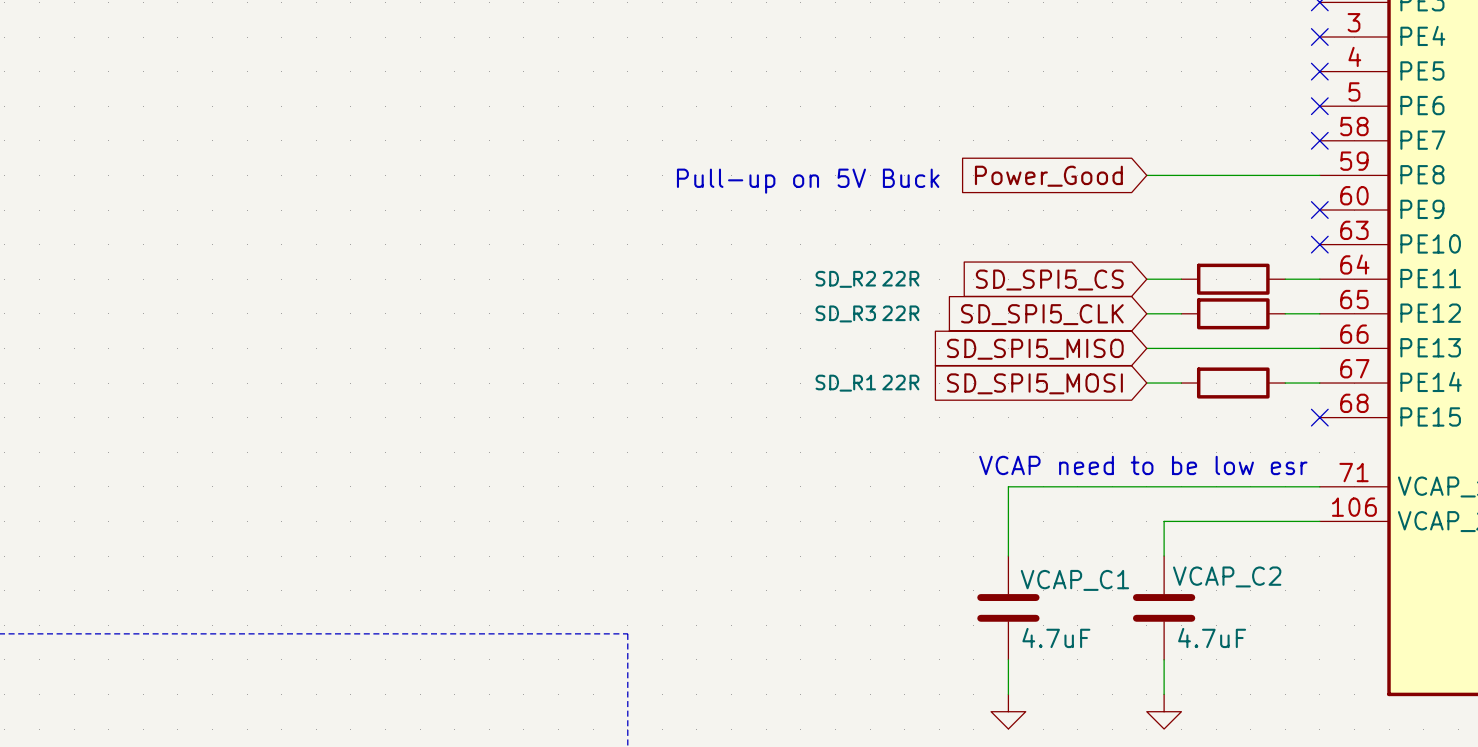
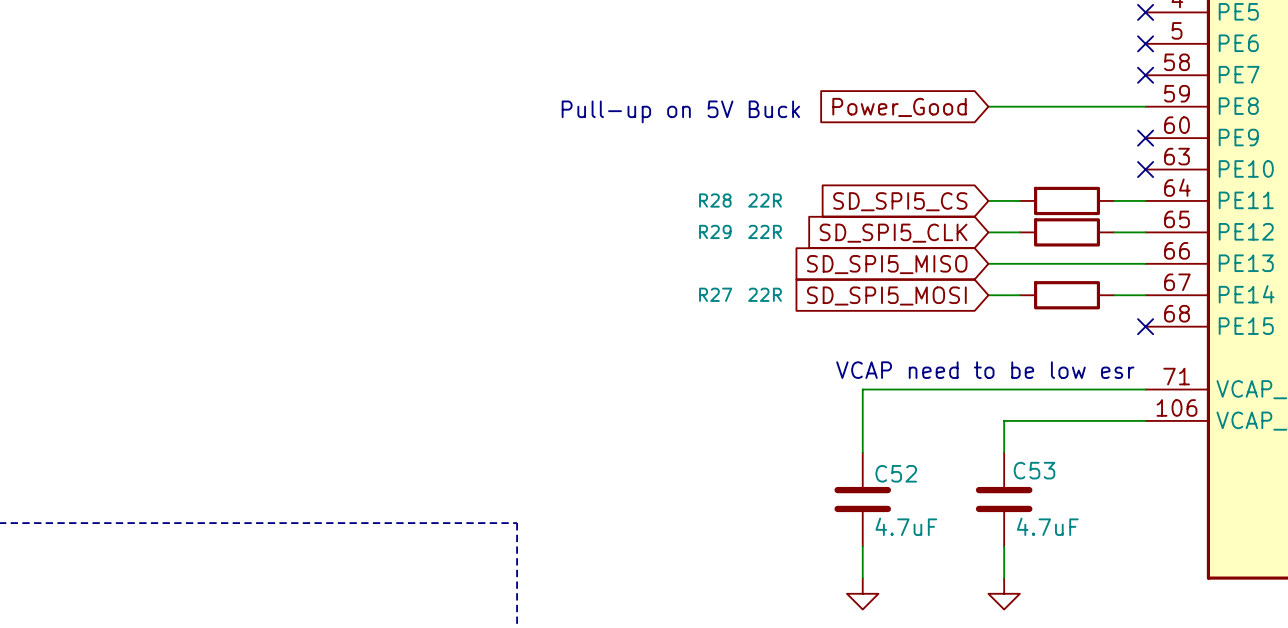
SD_R2 name: SD_R2 (845, 279) -> R28 (715, 200)
SD_R3 name: SD_R3 (845, 313) -> R29 (715, 231)
SD_R1 name: SD_R1 (845, 383) -> R27 (715, 294)
VCAP_C2 name: VCAP_C2 (1227, 576) -> C53 (1034, 470)
VCAP_C1 name: VCAP_C1 (1074, 580) -> C52 (896, 473)

